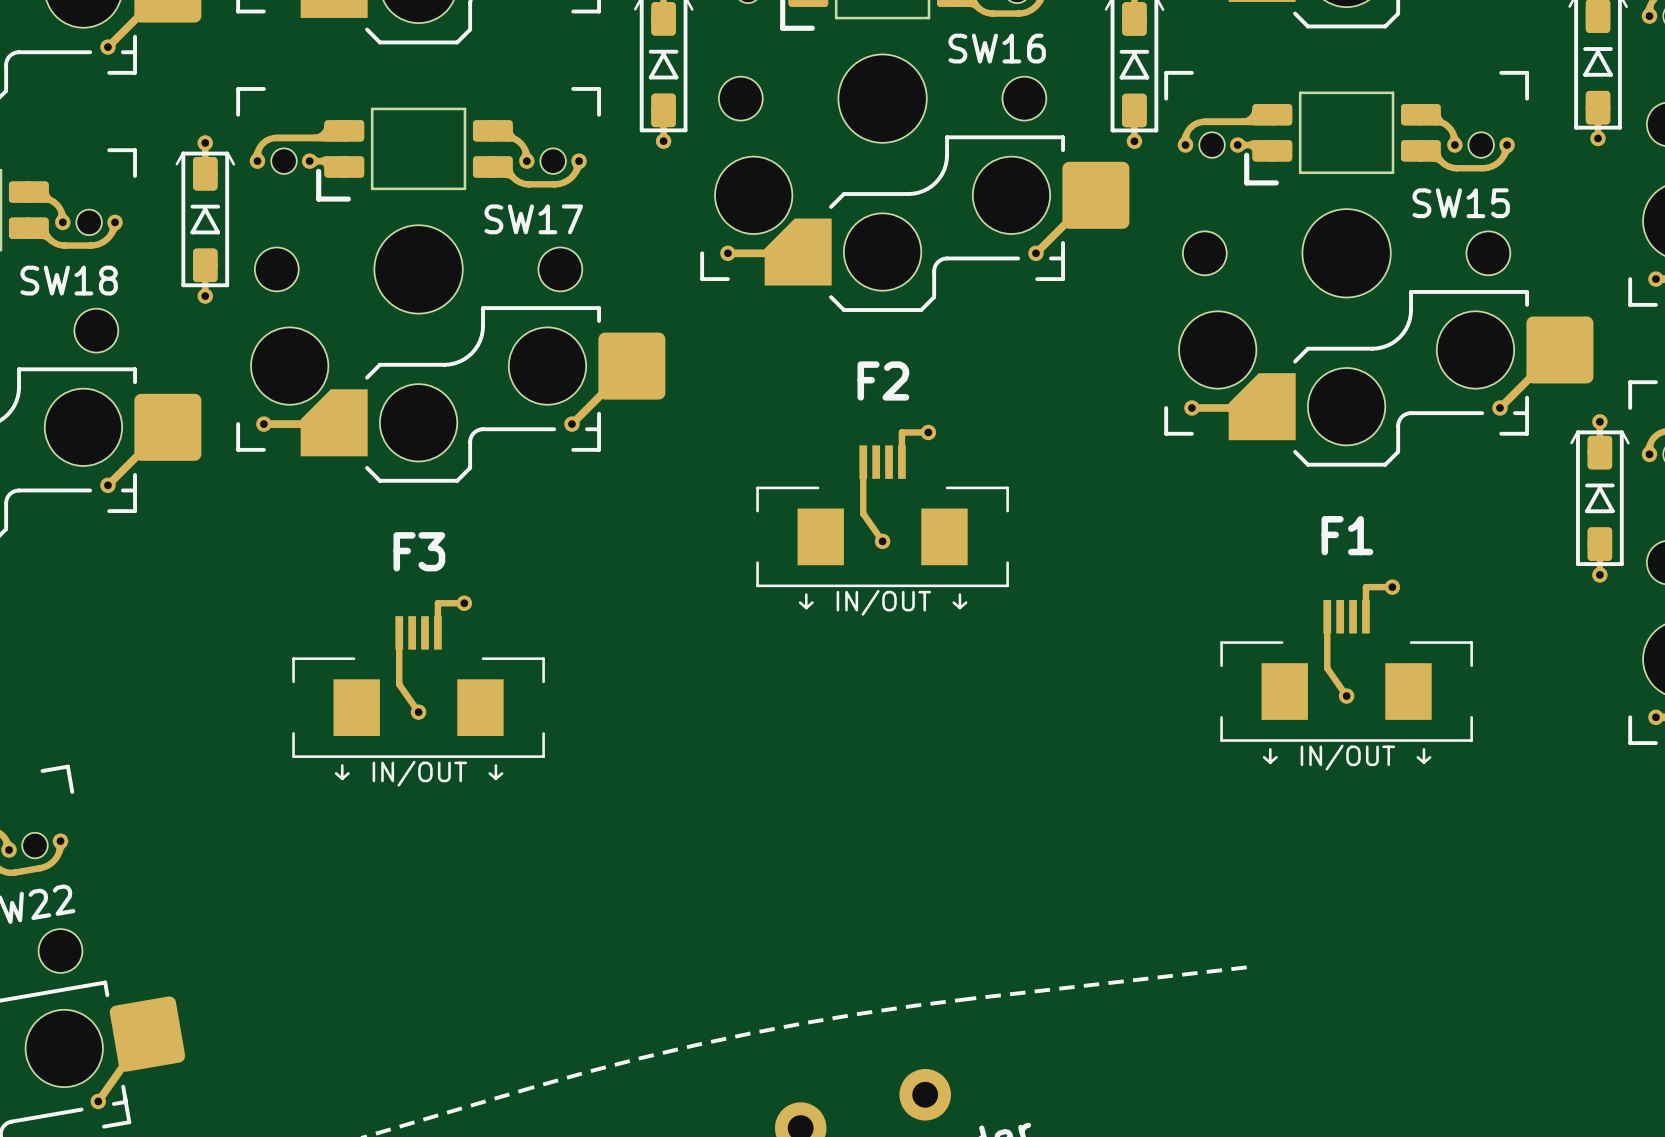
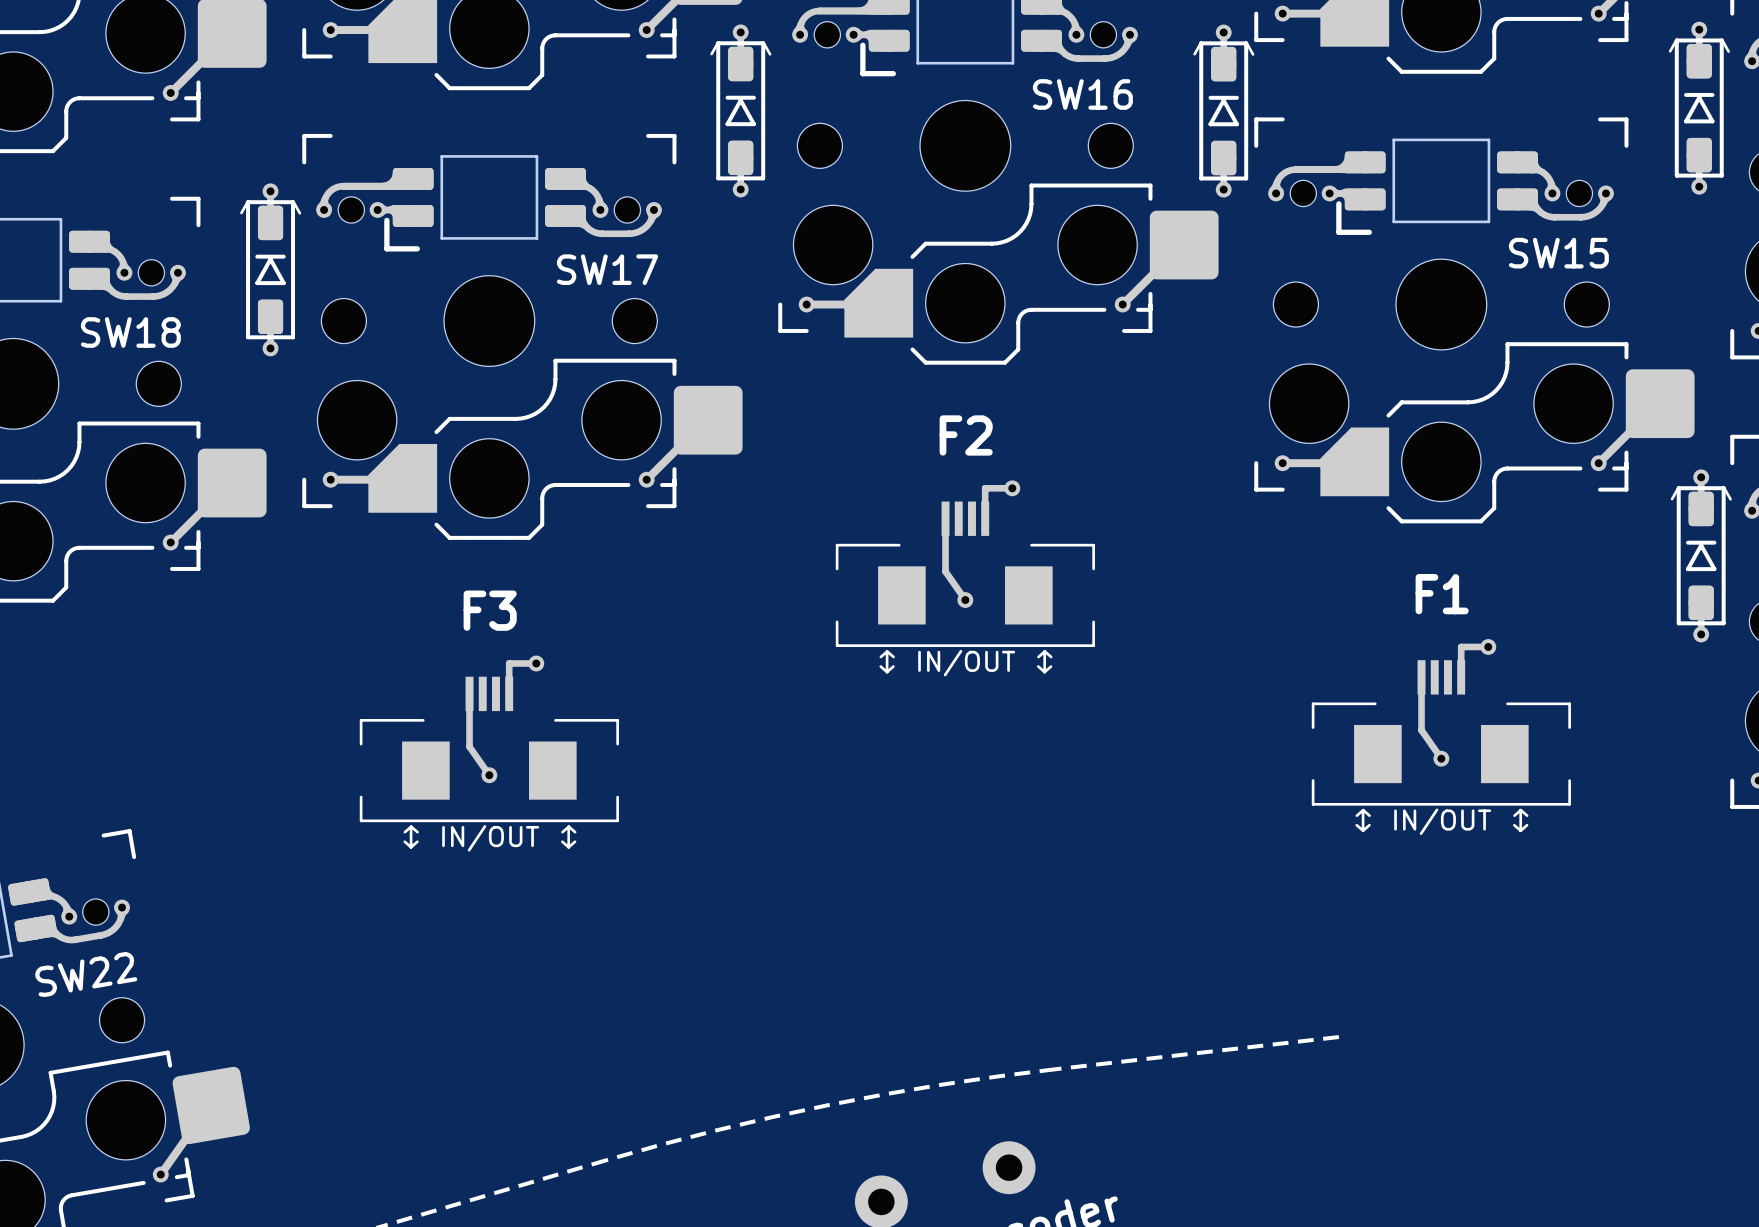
F2 footprint: [756, 424, 1009, 610] -> [835, 480, 1095, 674]
F1 footprint: [1220, 579, 1473, 764] -> [1311, 639, 1571, 833]
F3 footprint: [292, 595, 545, 781] -> [359, 655, 619, 849]

